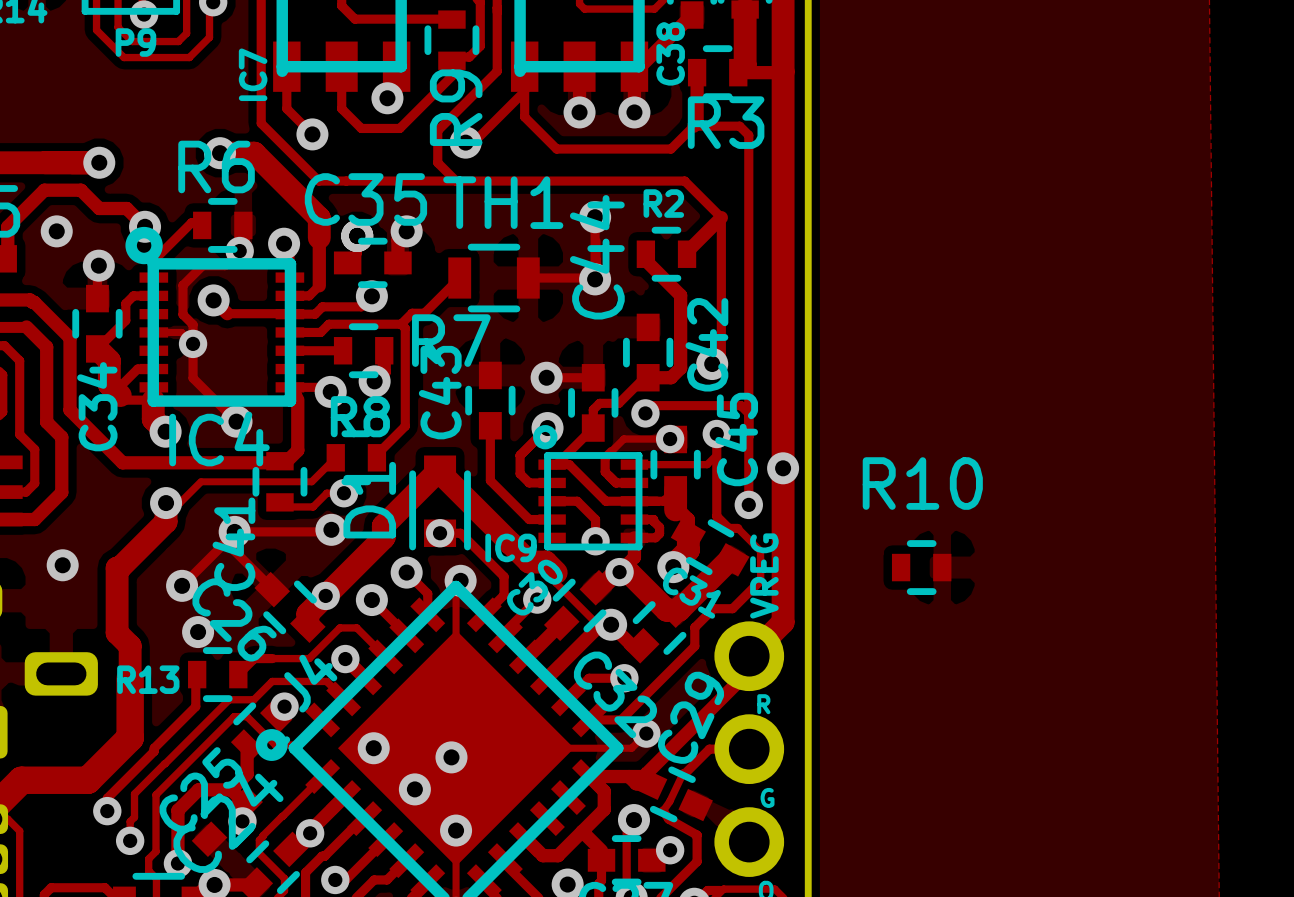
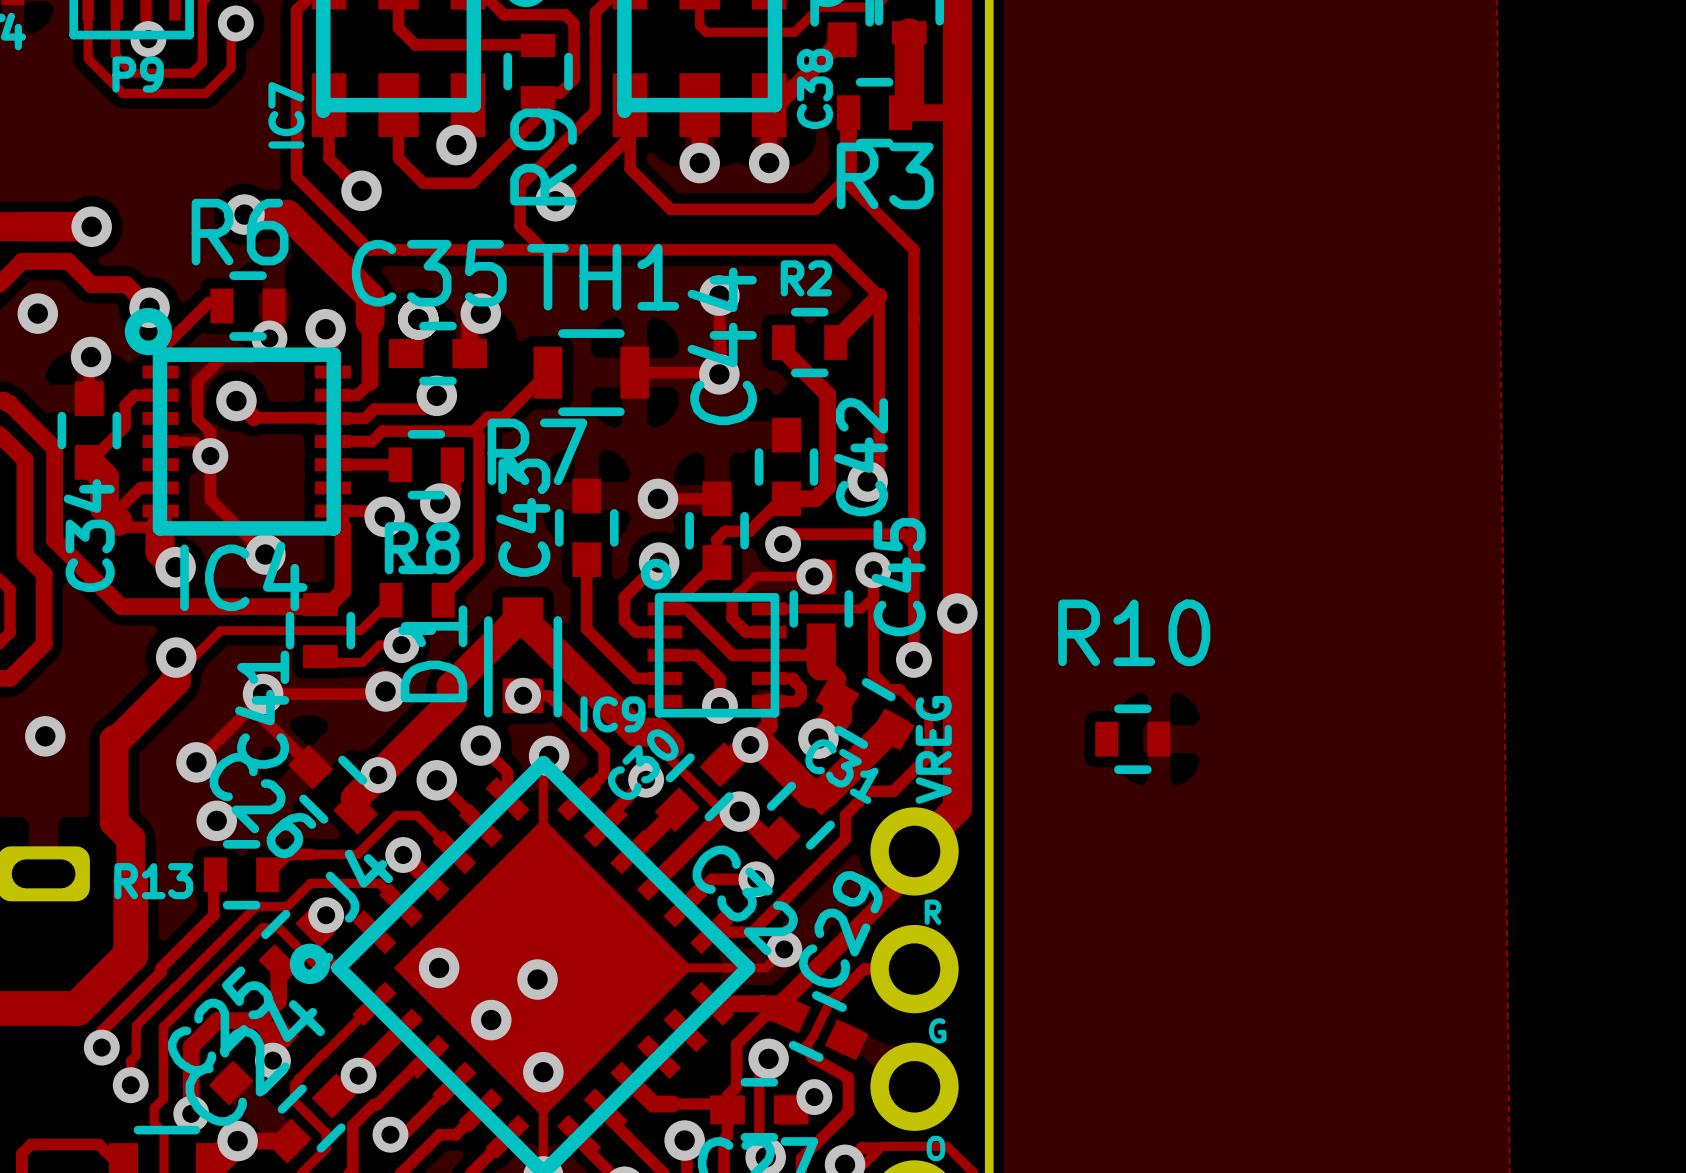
track: (693, 126) (739, 126) (748, 135) (748, 181) -> (844, 180) (913, 249)
track: (589, 776) (604, 791) (604, 809) (558, 855) -> (727, 1109) (721, 1104) (672, 1104)
track: (582, 831) (601, 850) -> (771, 1012) (768, 1012) (736, 1044) (736, 1086) (727, 1097)

